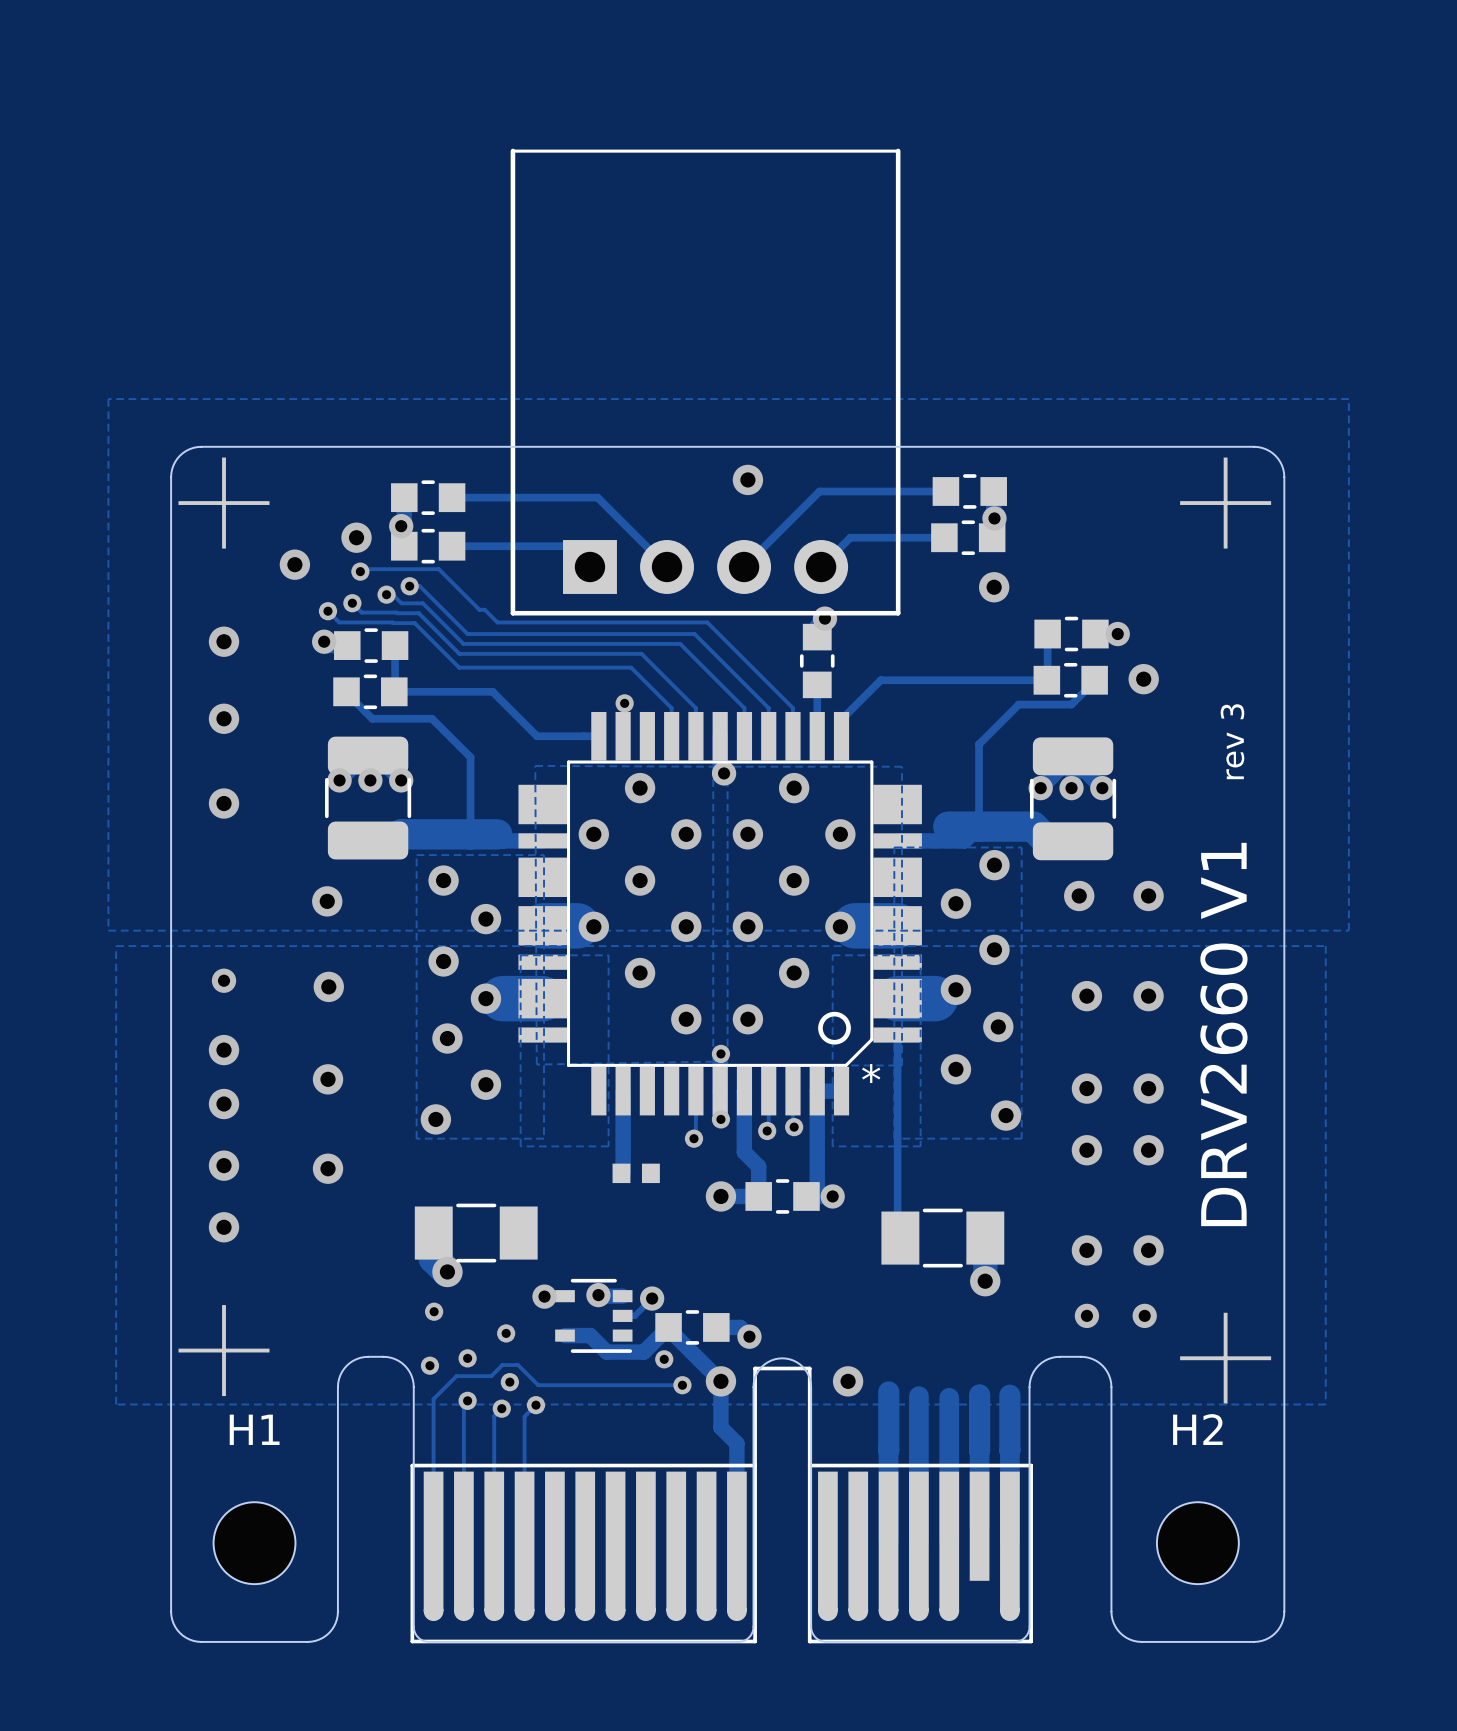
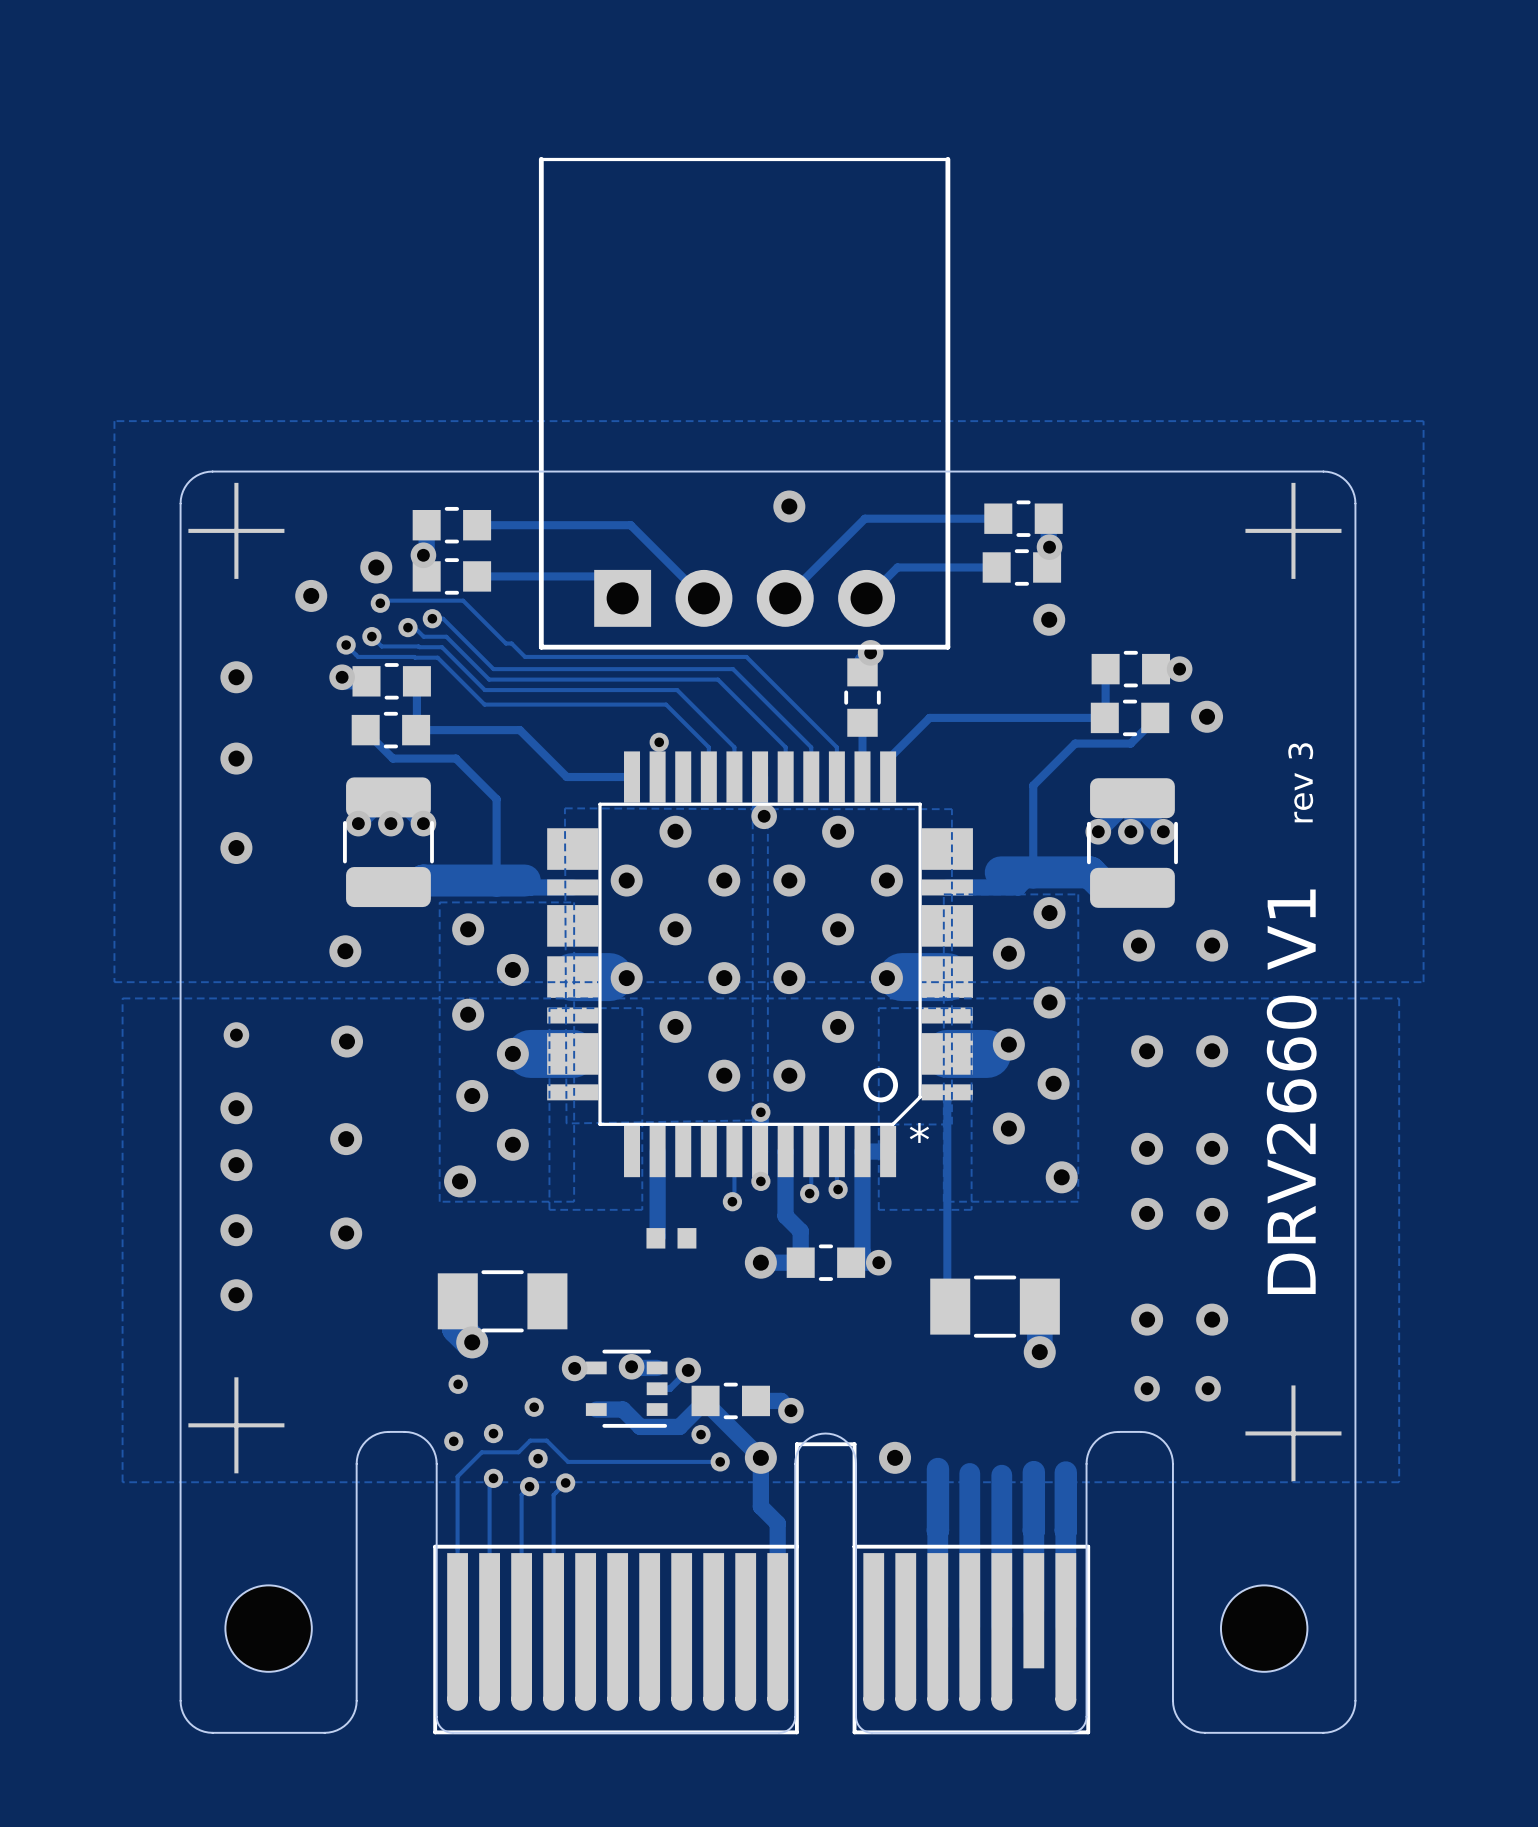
H1 name: H1 (254, 1429) -> none
H2 name: H2 (1197, 1429) -> none

